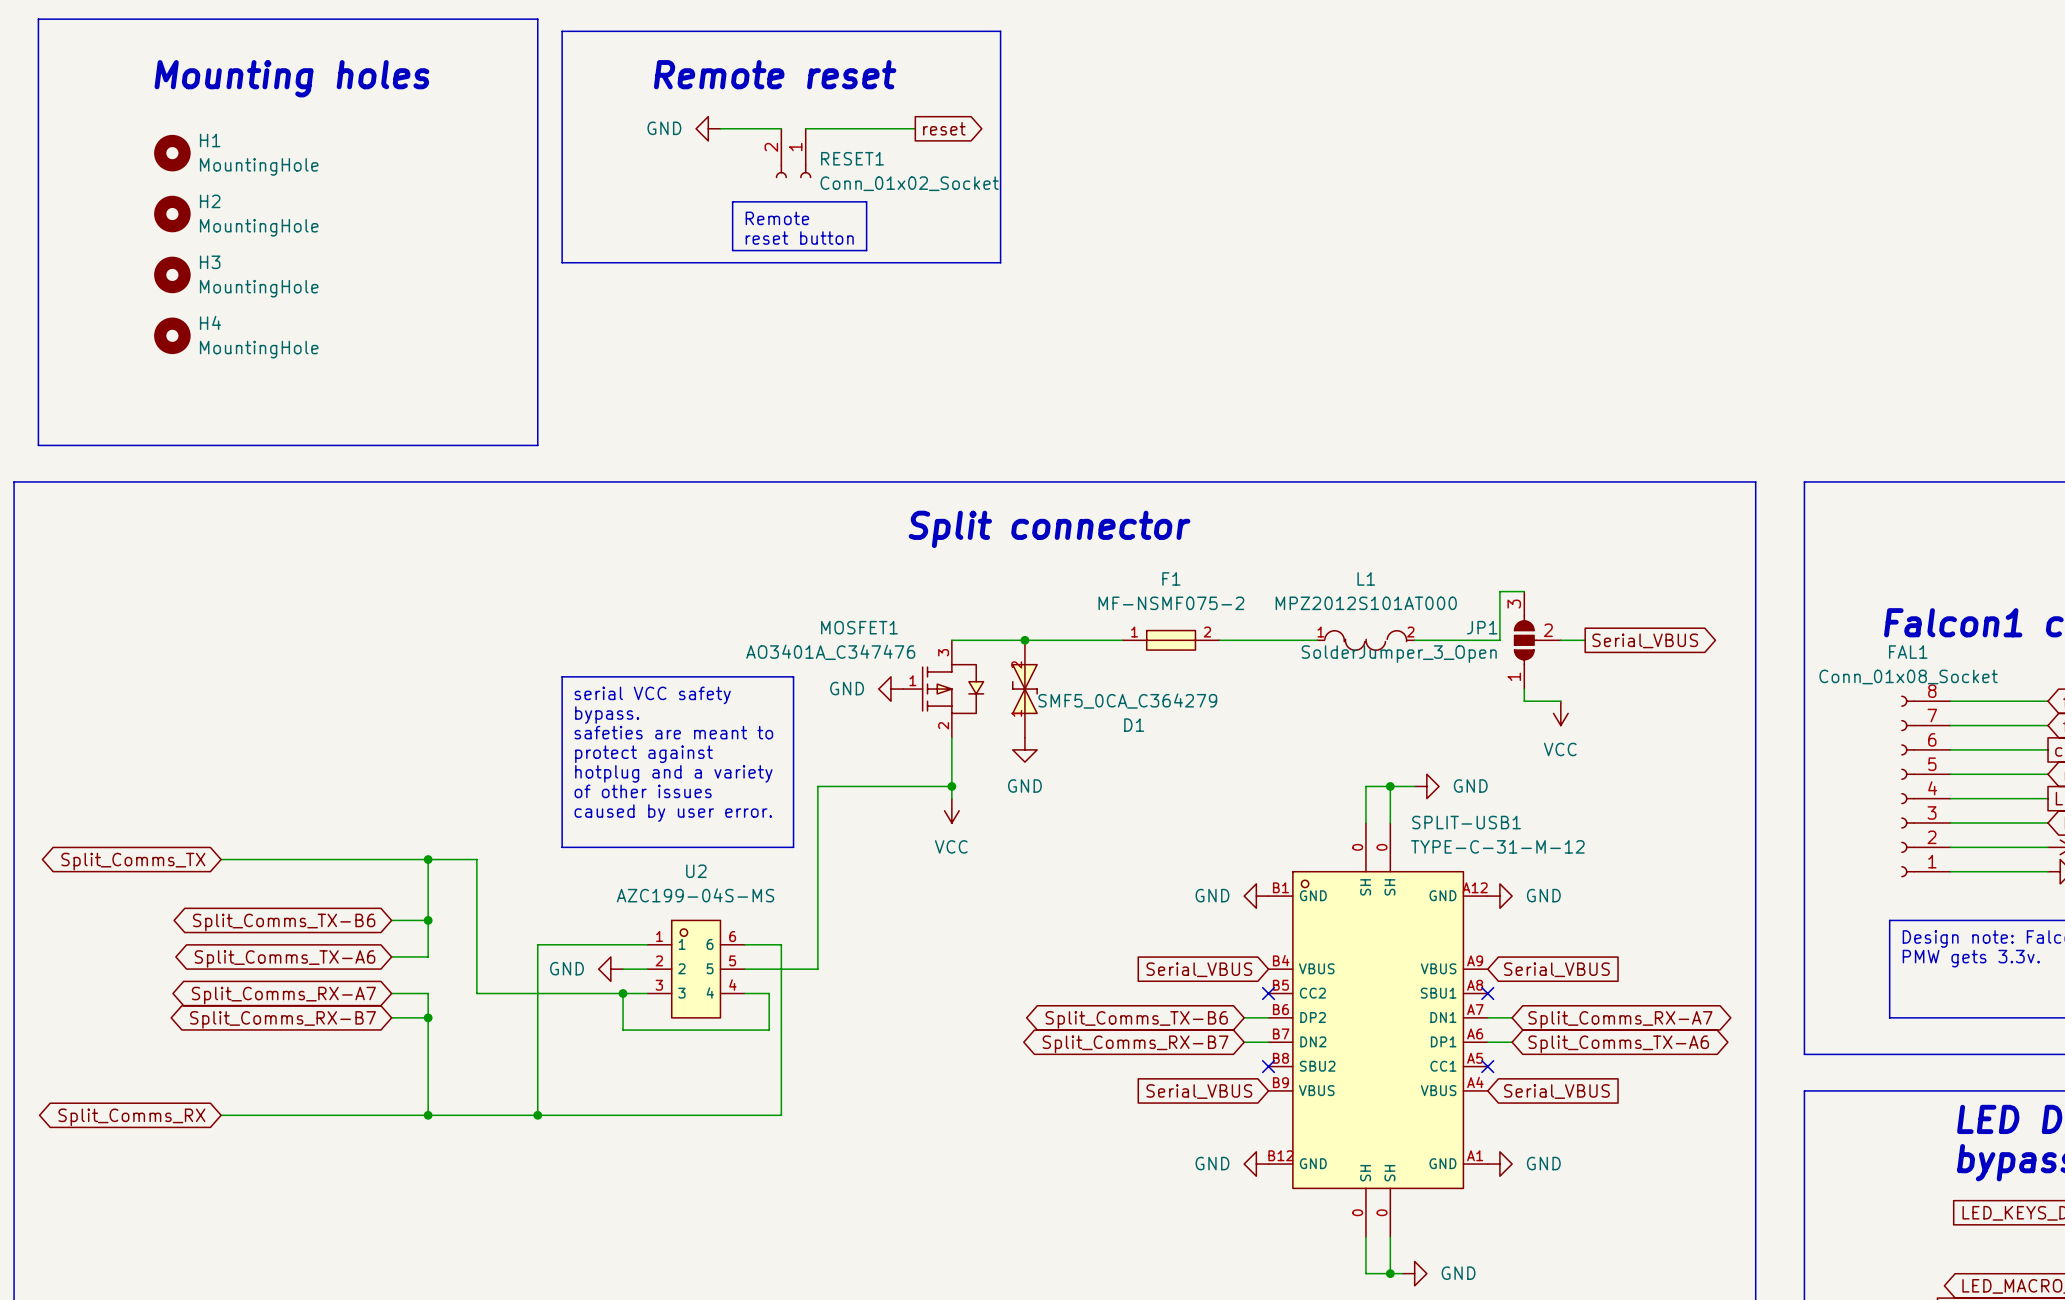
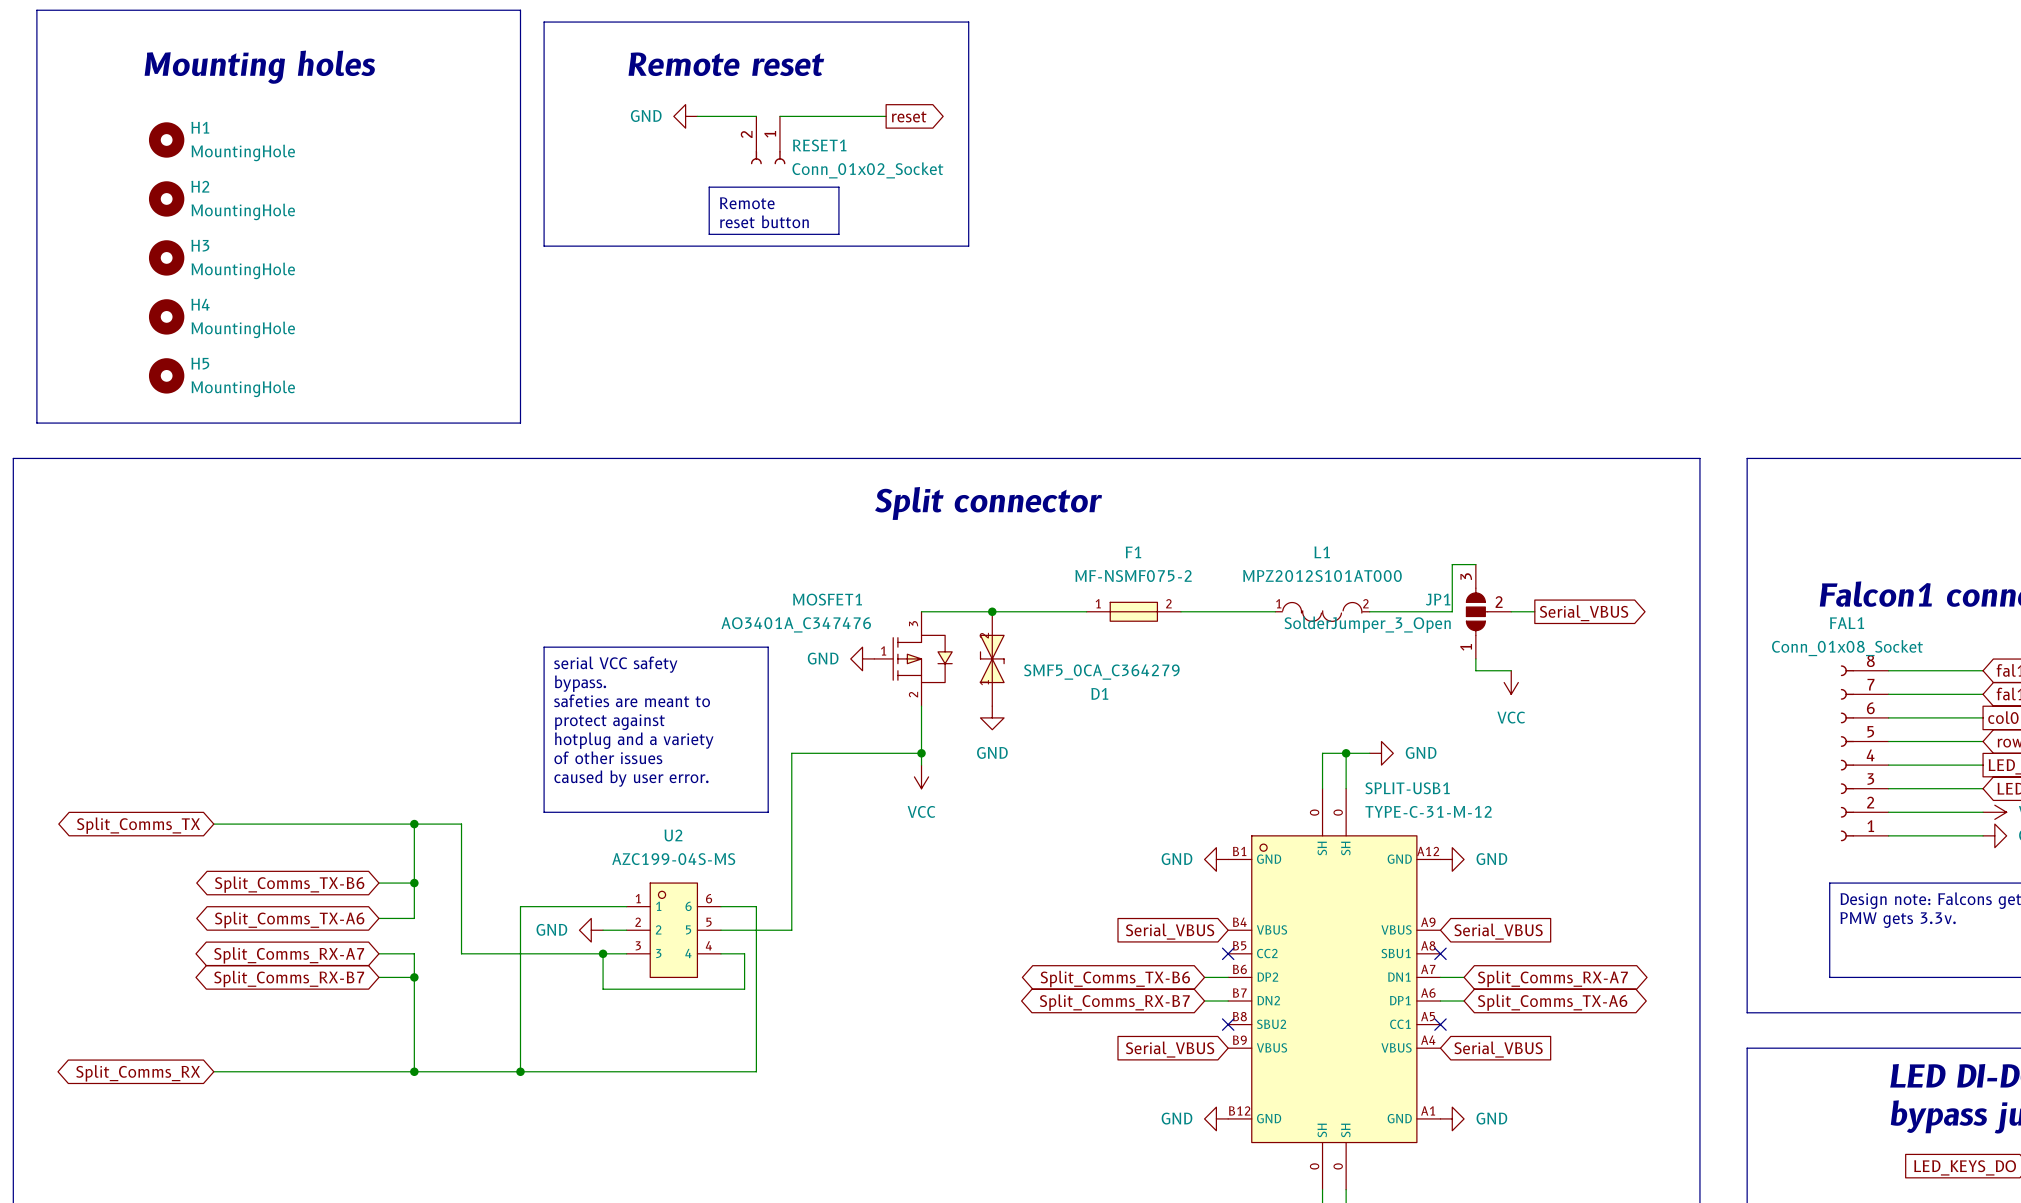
H5: none -> MountingHole (166, 375)

